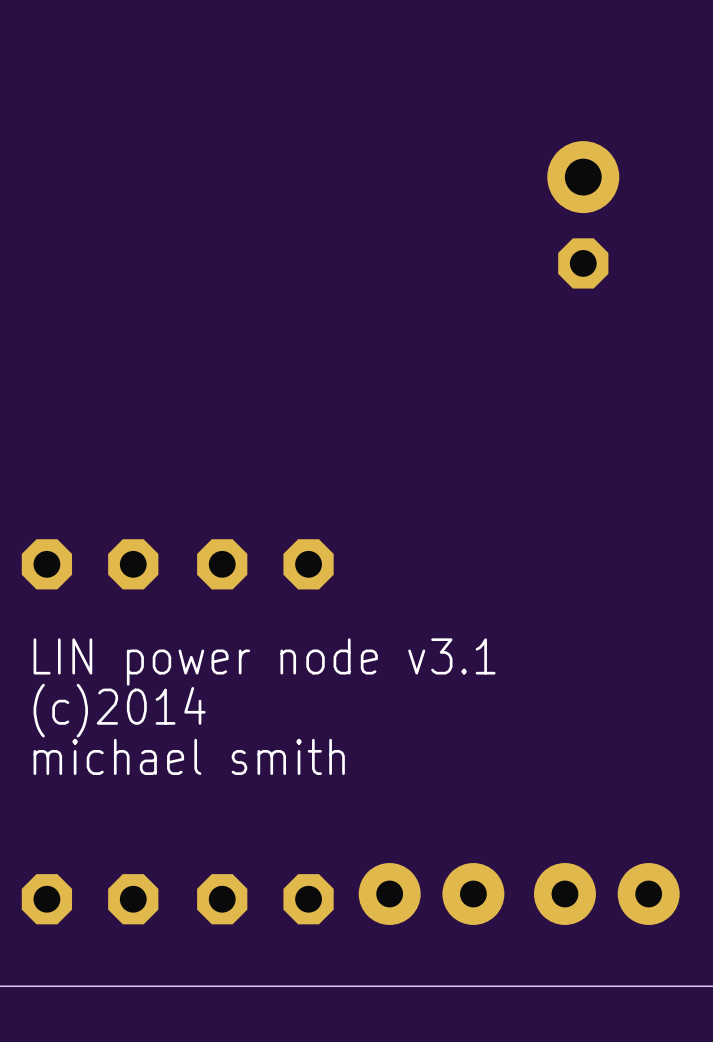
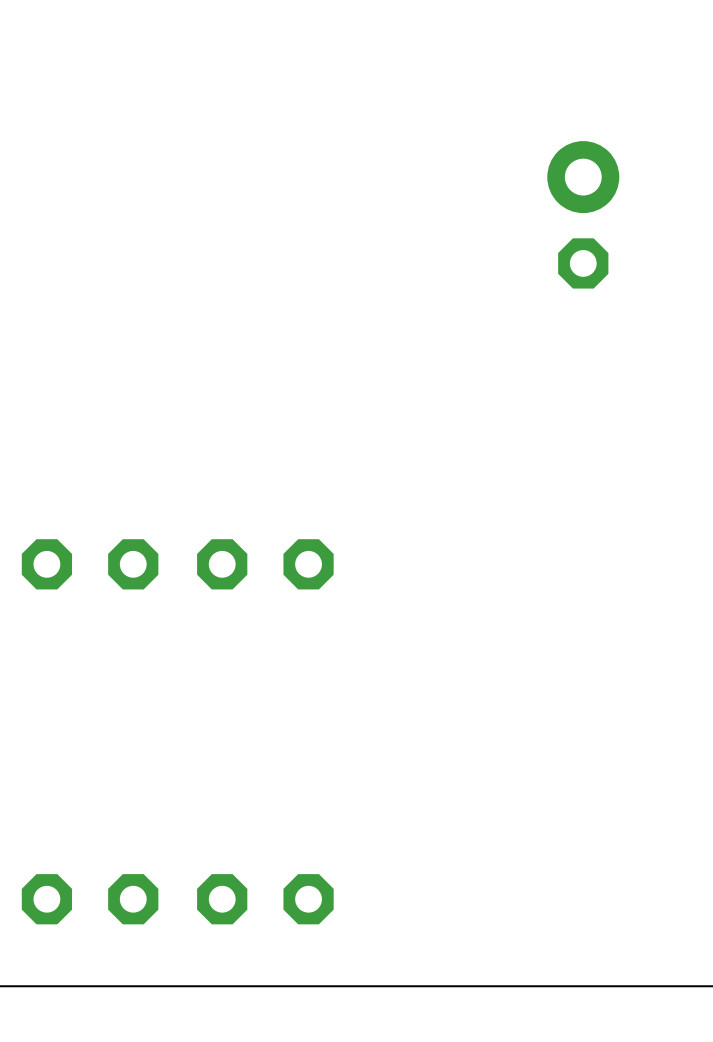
text: LIN power node v3.1 (264, 662) -> none
text: (c)2014 (119, 710) -> none
text: michael smith (189, 756) -> none
part: (431, 894) -> none
part: (606, 894) -> none

